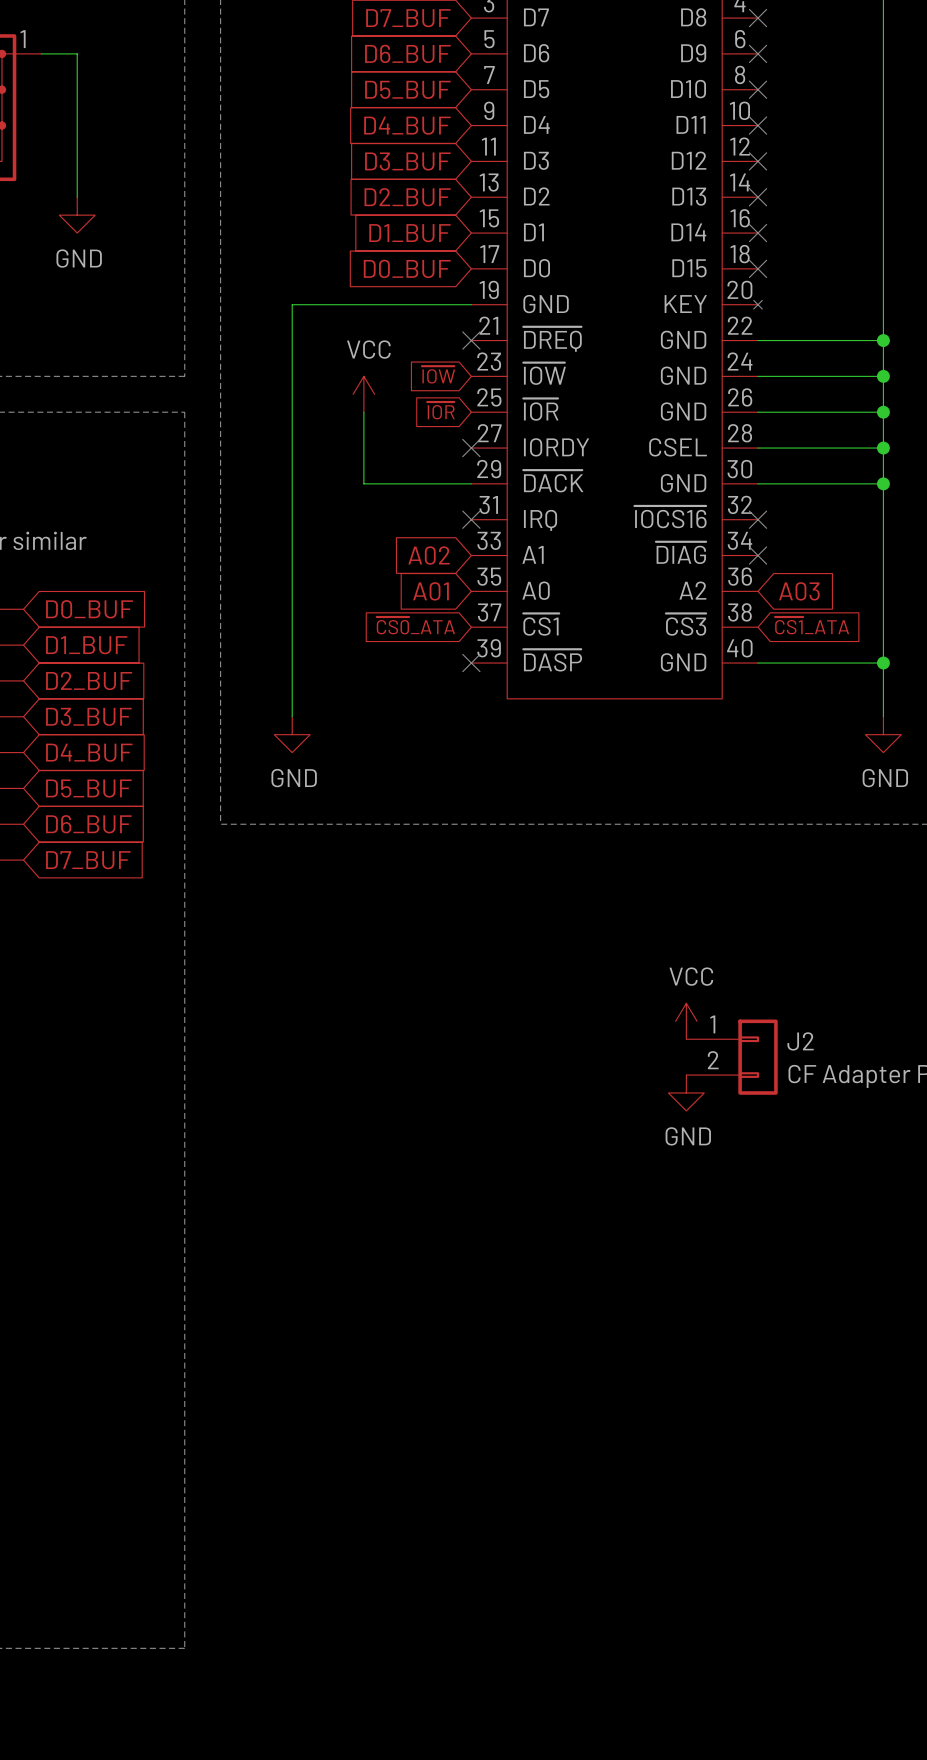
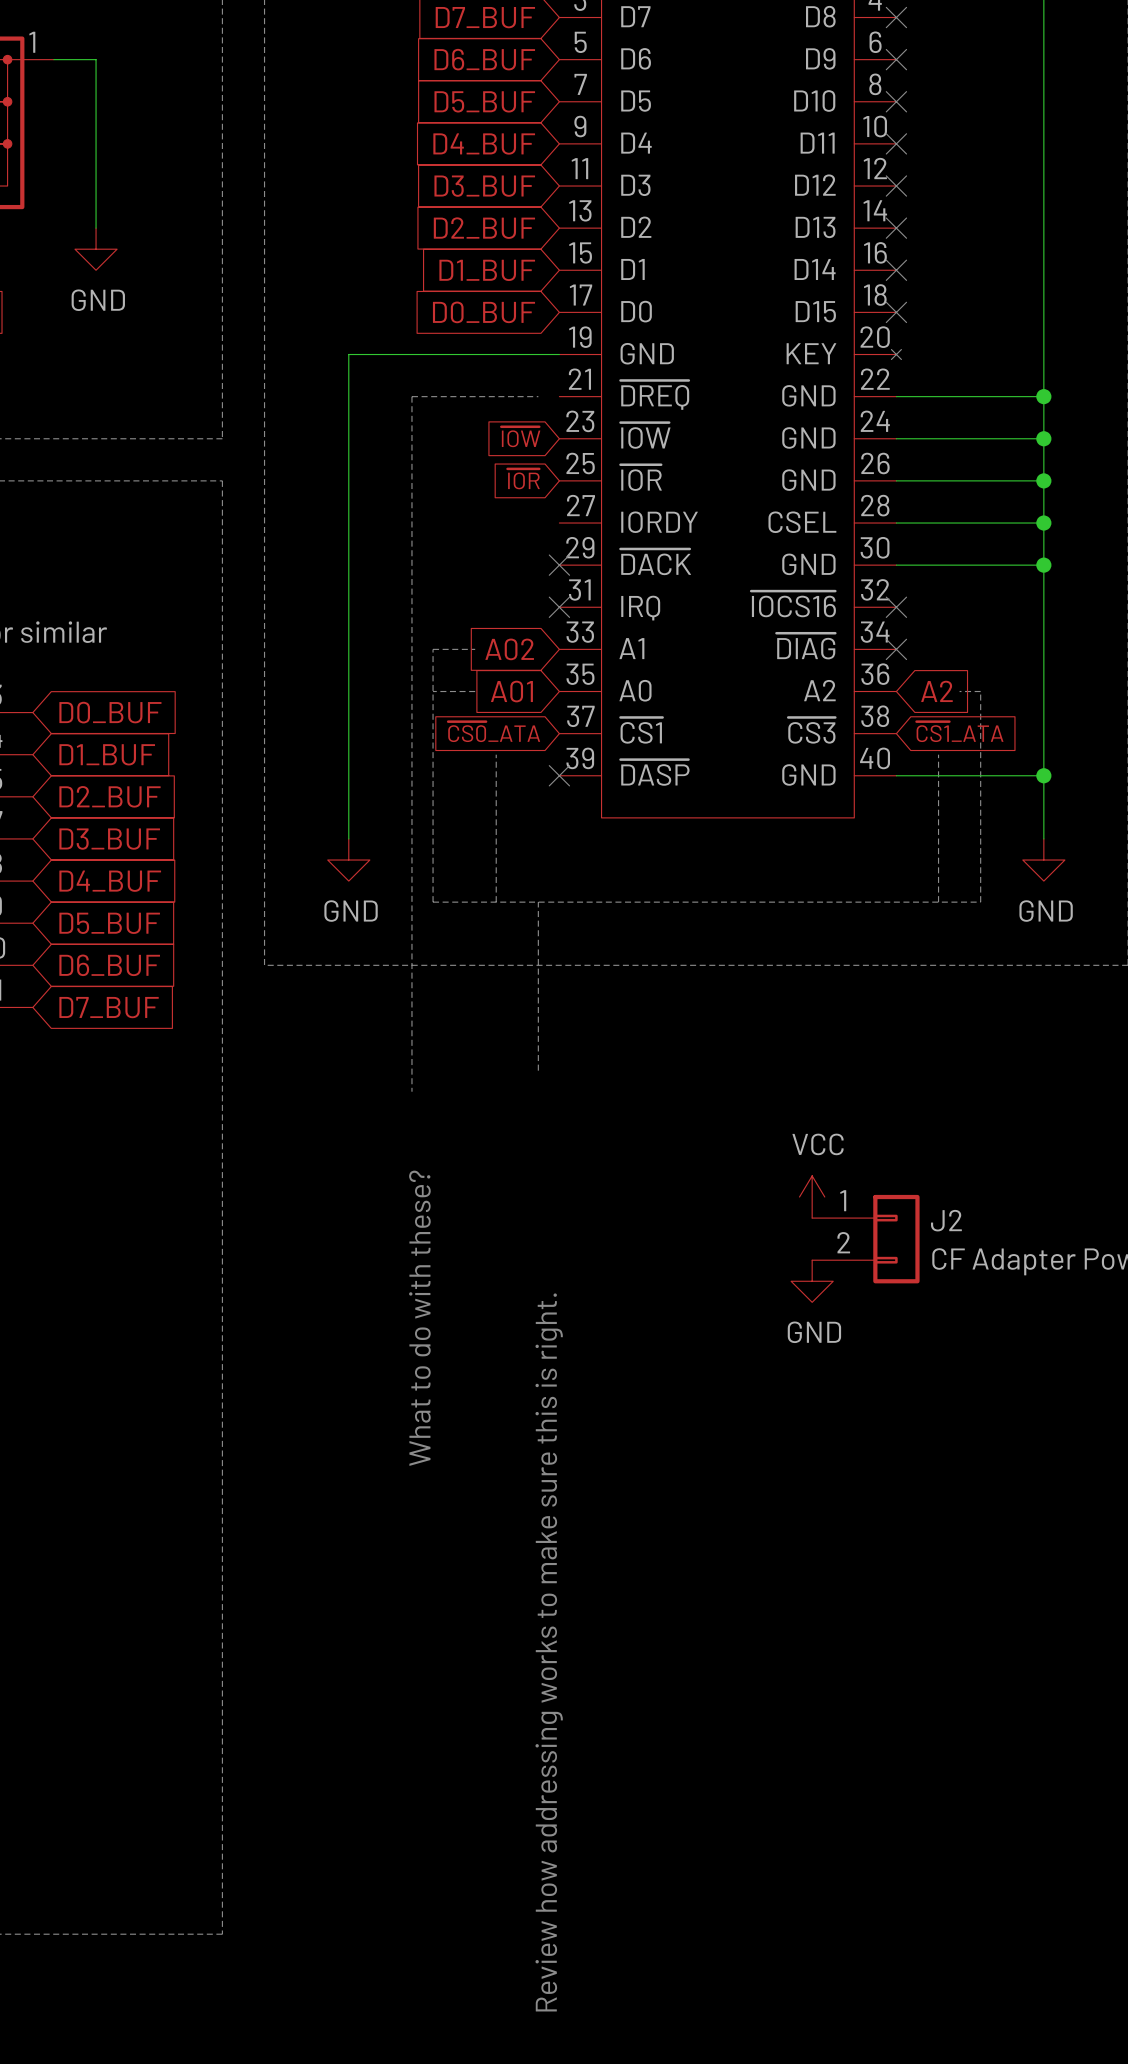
line: none -> (538, 396) (411, 396) (411, 1091)
no-connect mark: (471, 340) -> none
power symbol: VCC (363, 394) -> none
wire: (363, 412) (363, 483) (471, 483) -> none
no-connect mark position: (471, 448) -> (559, 565)
line: none -> (475, 649) (433, 649) (433, 902) (980, 902) (980, 691) (959, 691)
line: none -> (433, 691) (475, 691)
global label: A03 (799, 591) -> A2 (936, 691)
line: none -> (496, 754) (496, 902)
line: none -> (938, 754) (938, 902)
line: none -> (538, 902) (538, 1070)
text: none -> What to do with these? (419, 1318)
text: none -> Review how addressing works to make sure this is right. (549, 1652)

